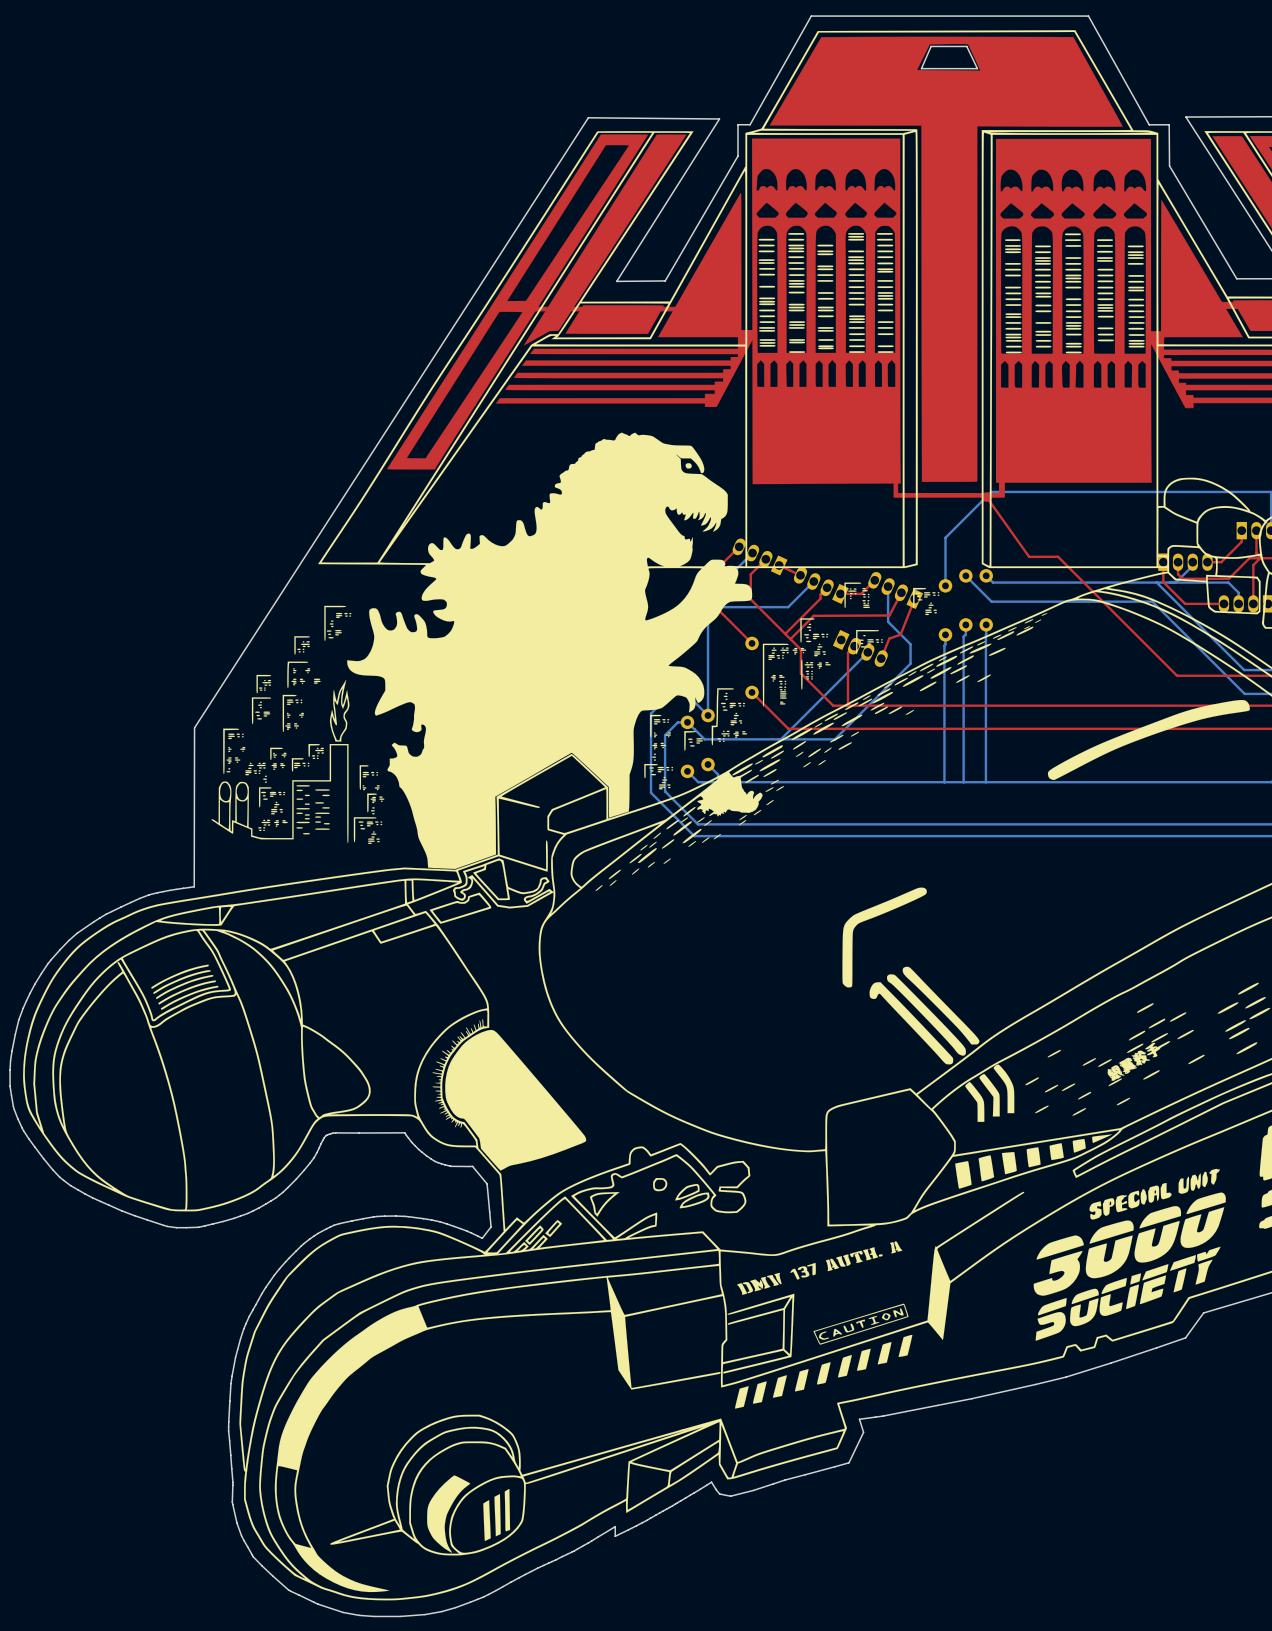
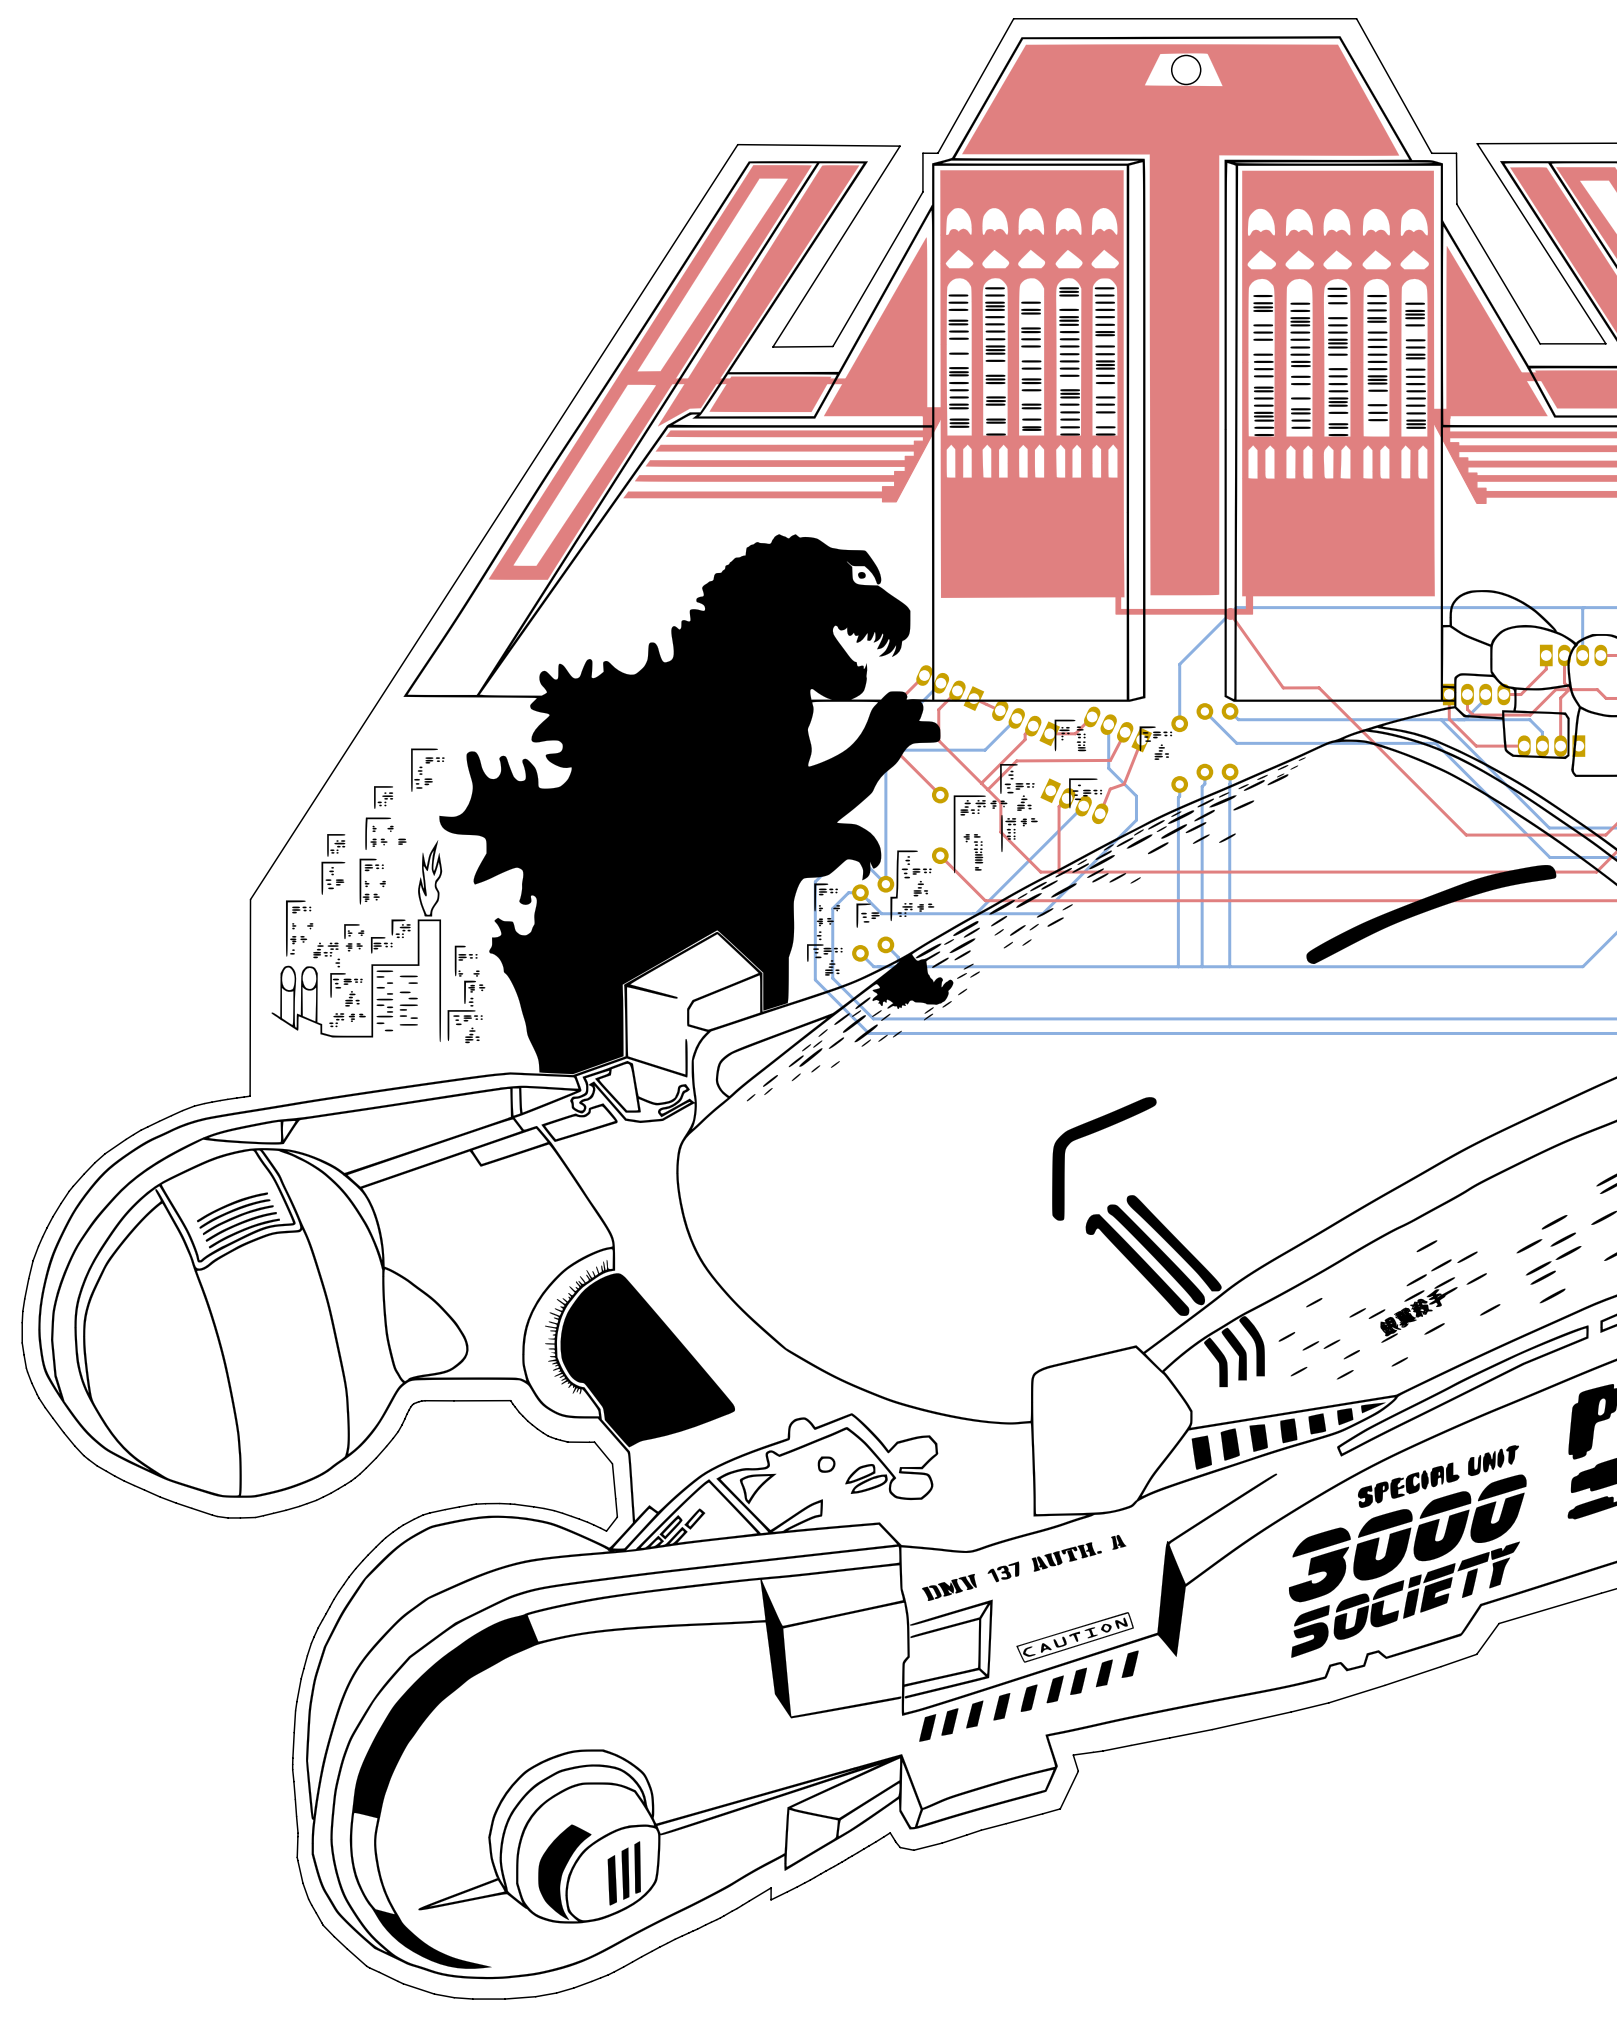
round board edge: none -> [1171, 55, 1202, 85]
board edge: (931, 46) (921, 68) (977, 68) (966, 46) (931, 46) -> none

